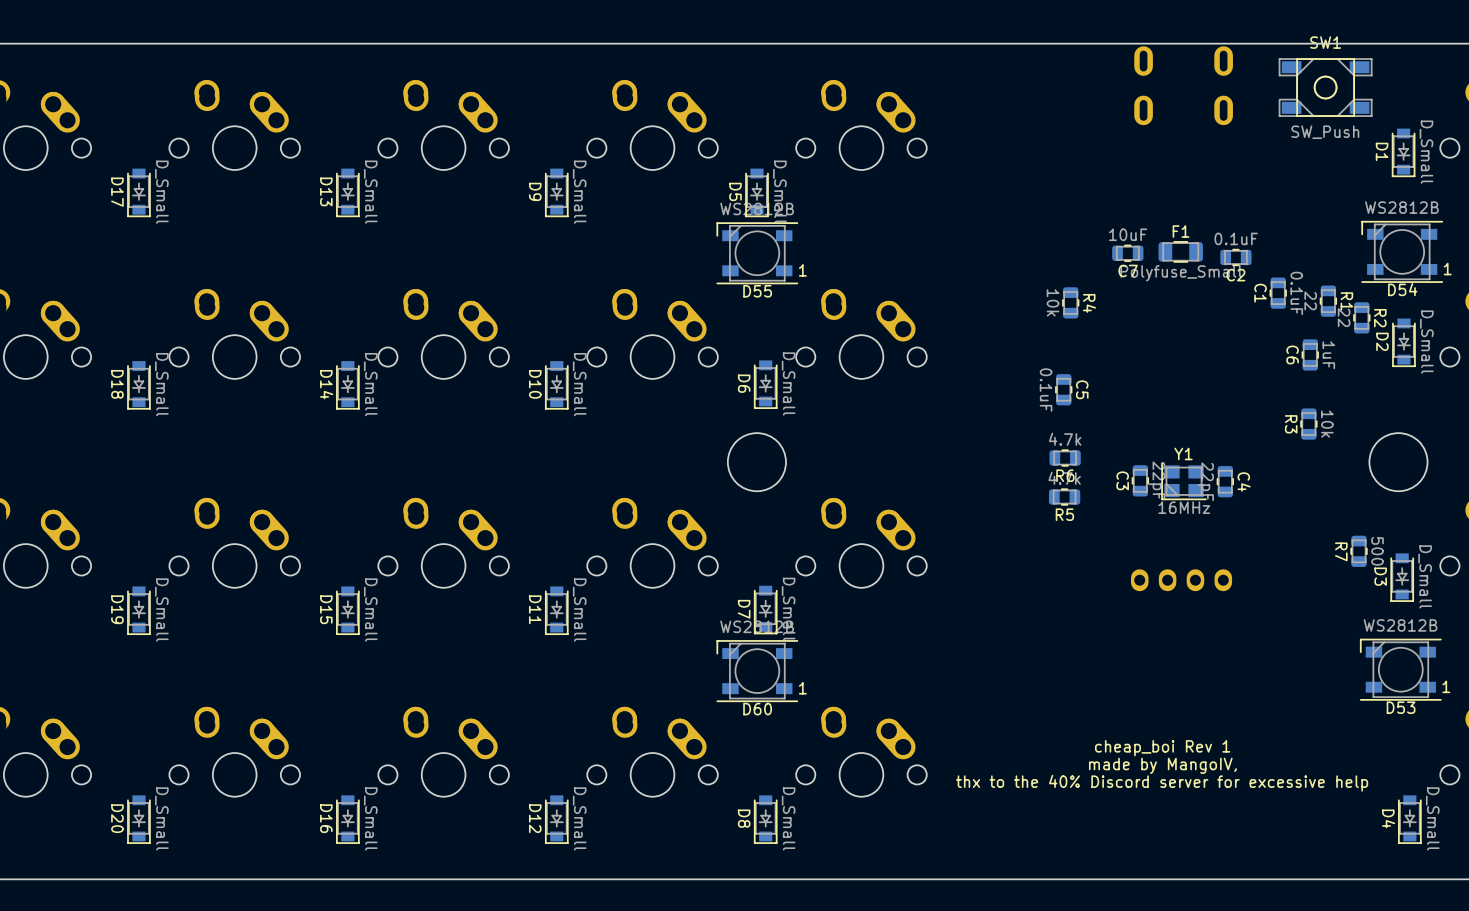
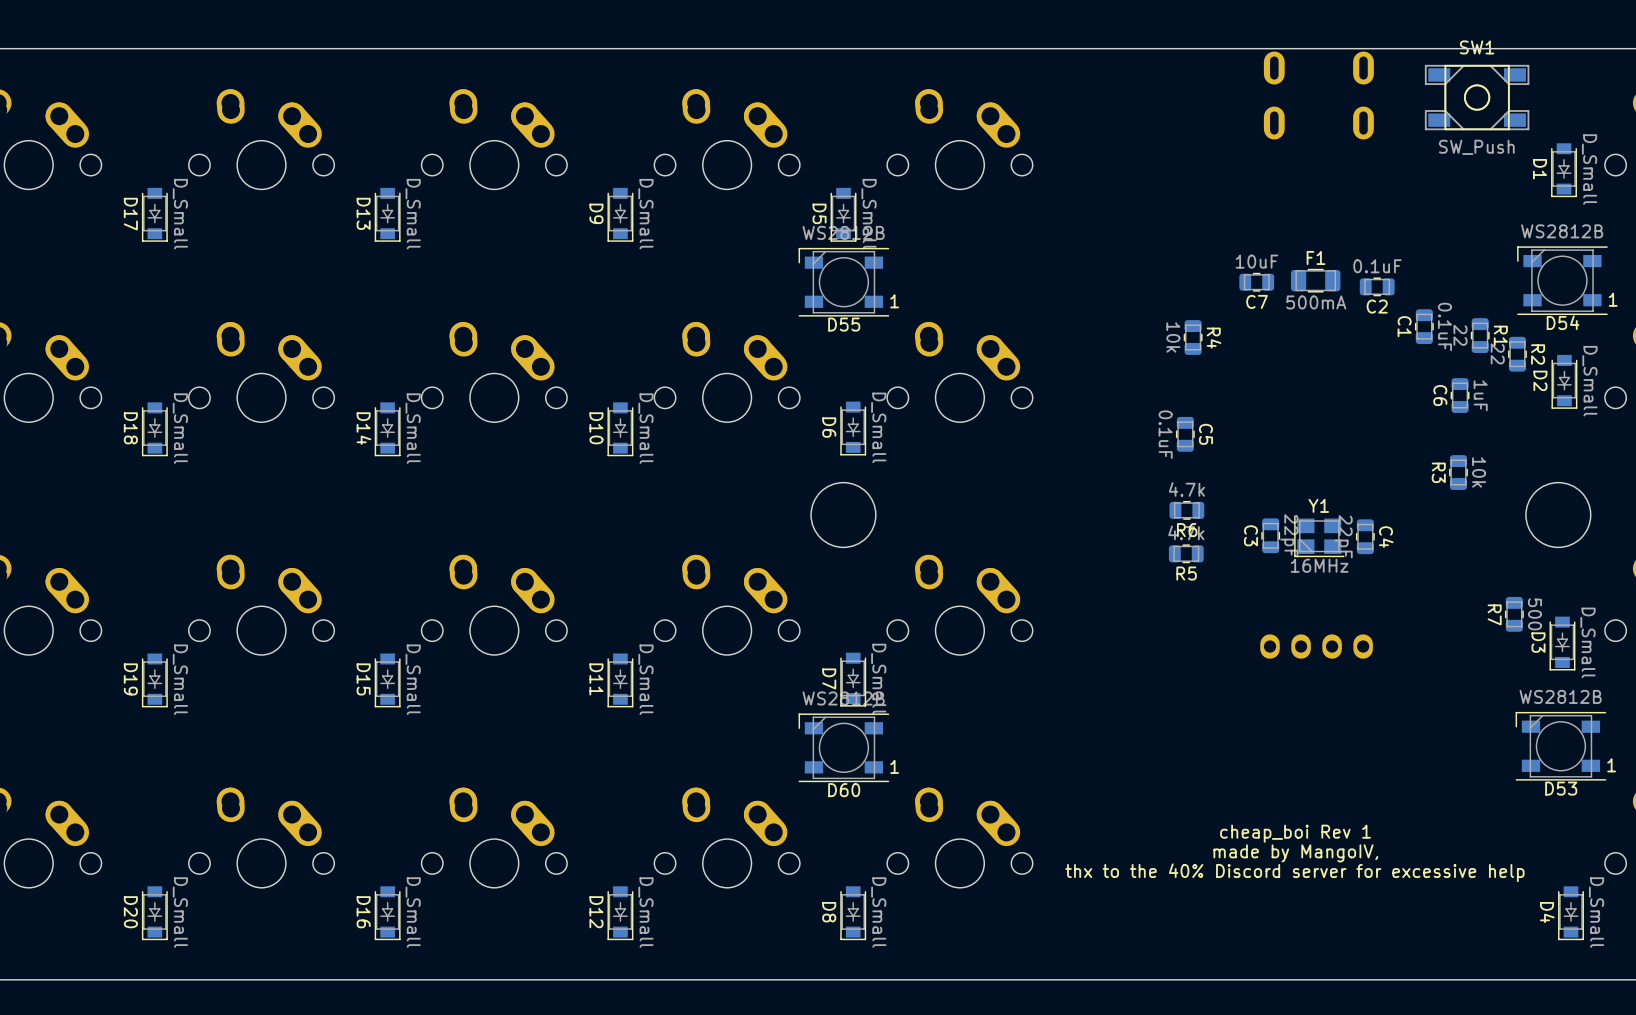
F1 value: Polyfuse_Small (1181, 273) -> 500mA (1316, 302)

